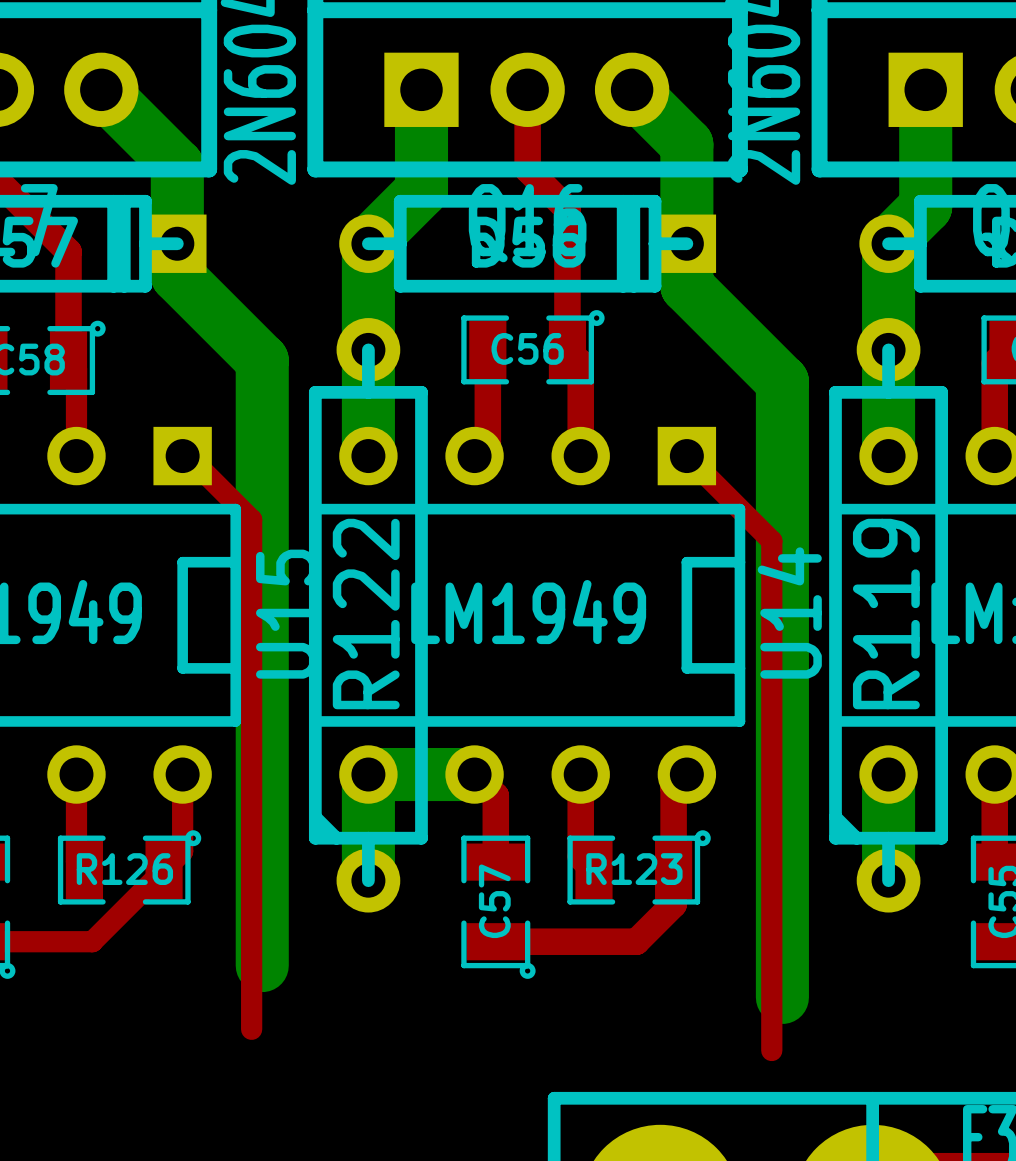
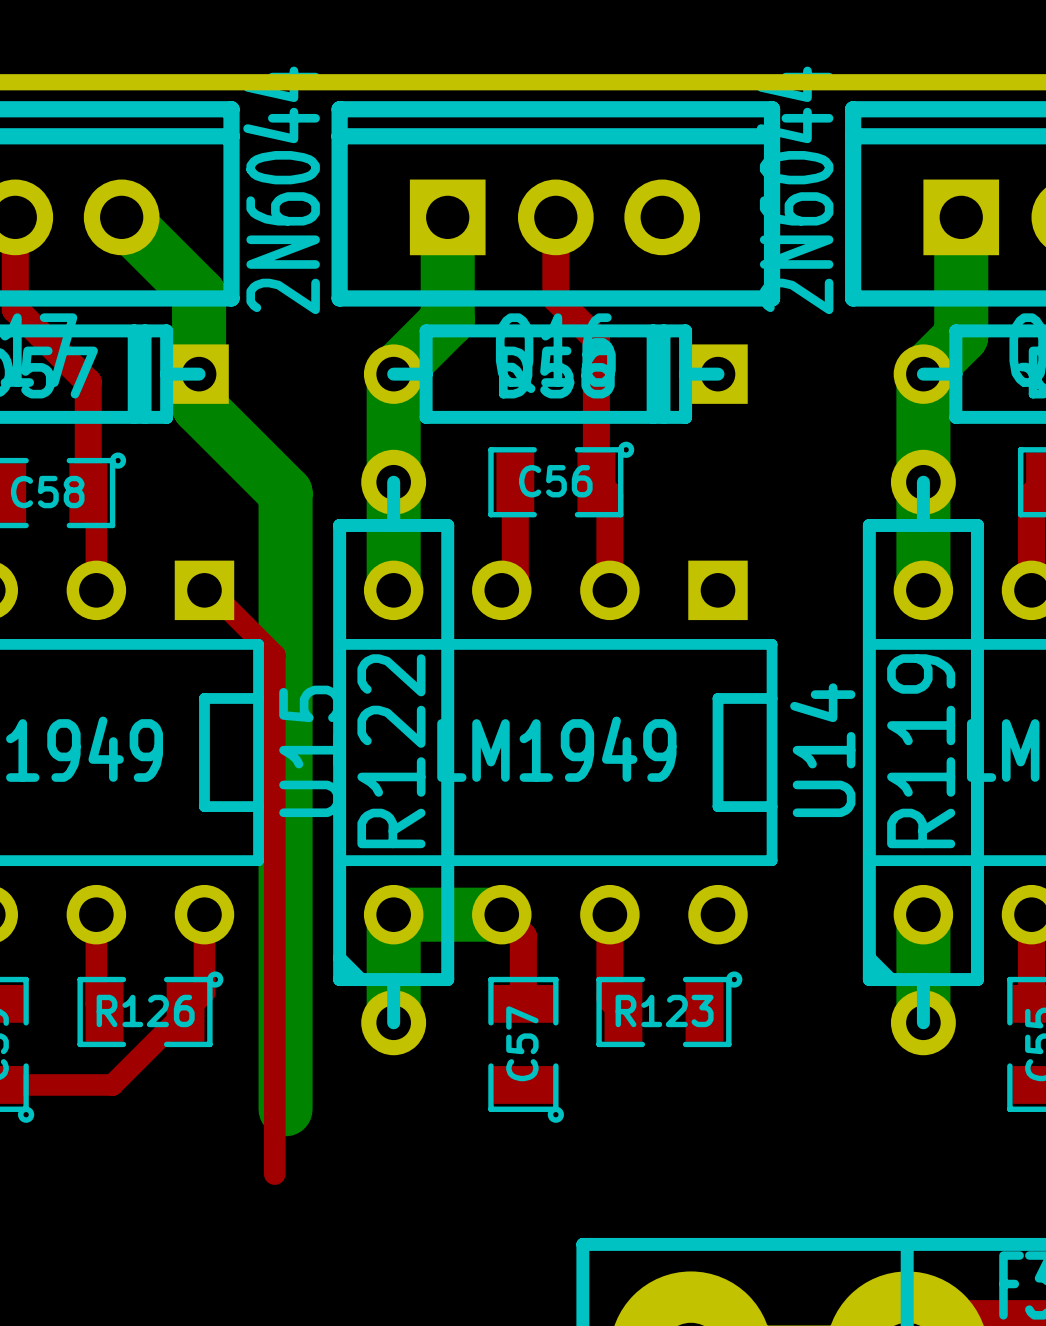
bottom track: (632, 89) (686, 144) (686, 286) (782, 381) (782, 997) -> none
top track: (686, 456) (771, 540) (771, 1050) -> none
top track: (686, 774) (673, 787) (673, 904) (636, 941) (495, 941) -> none

